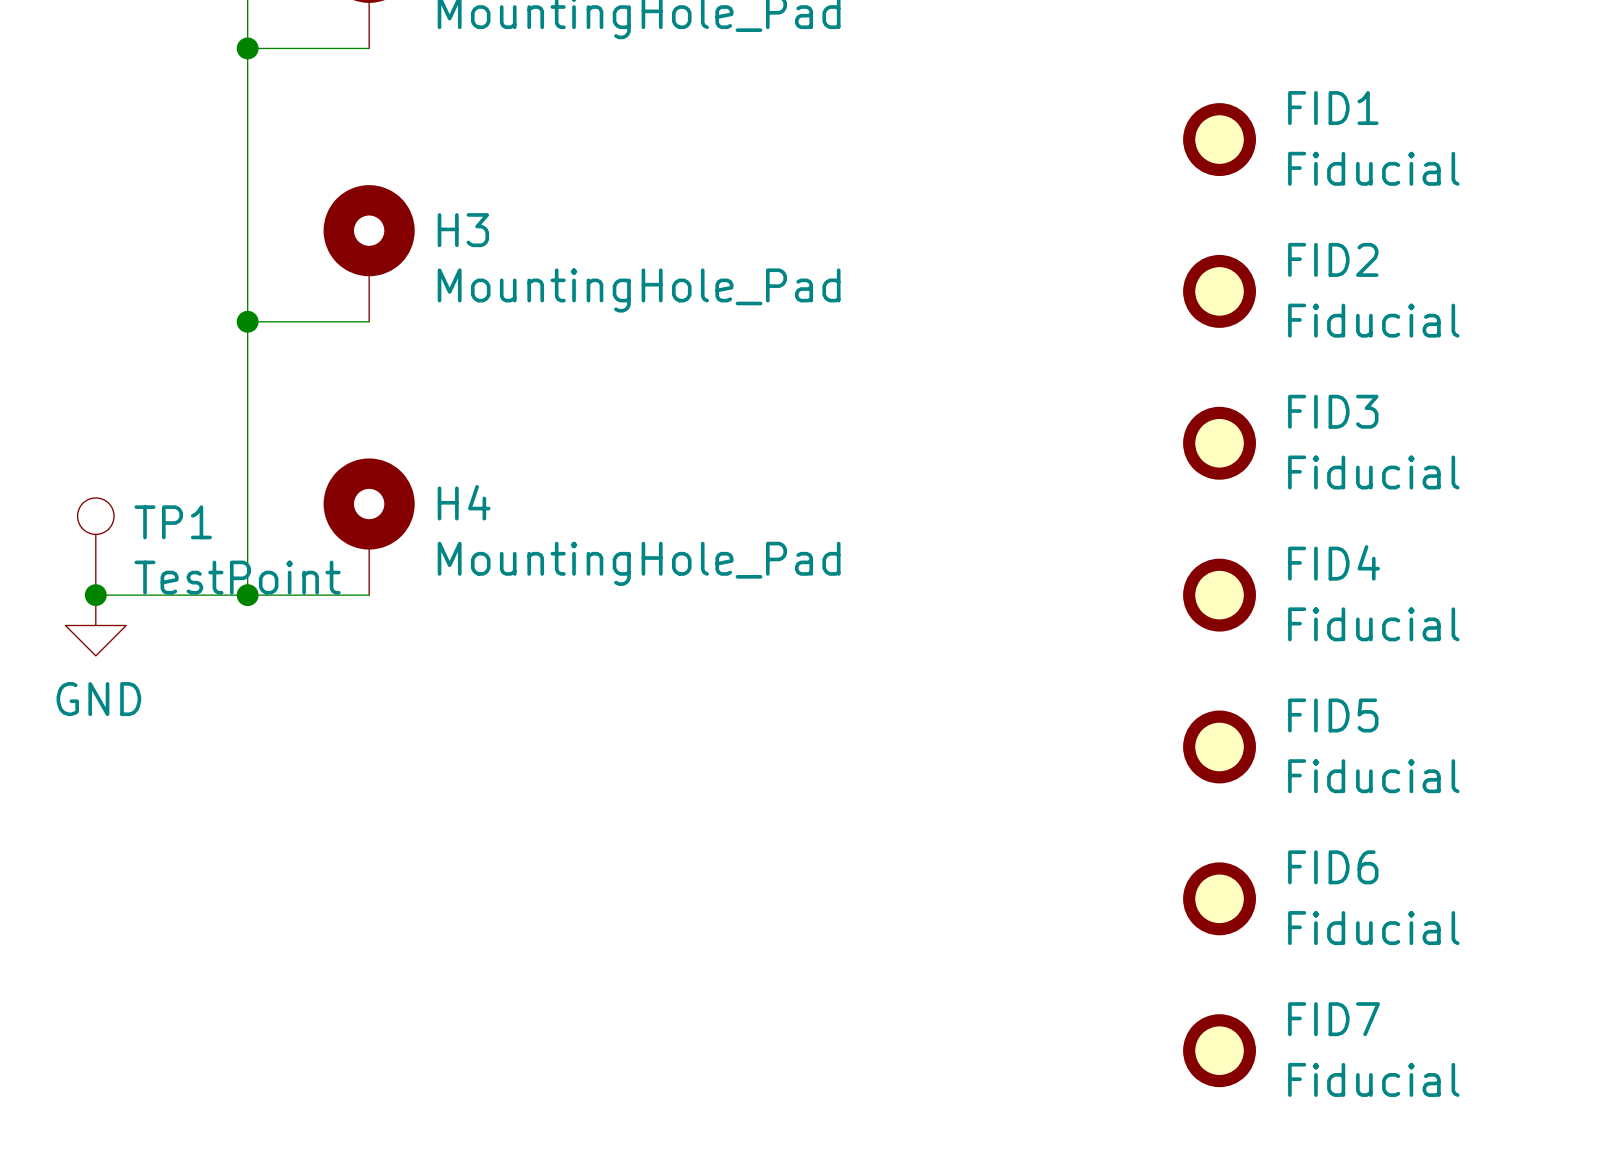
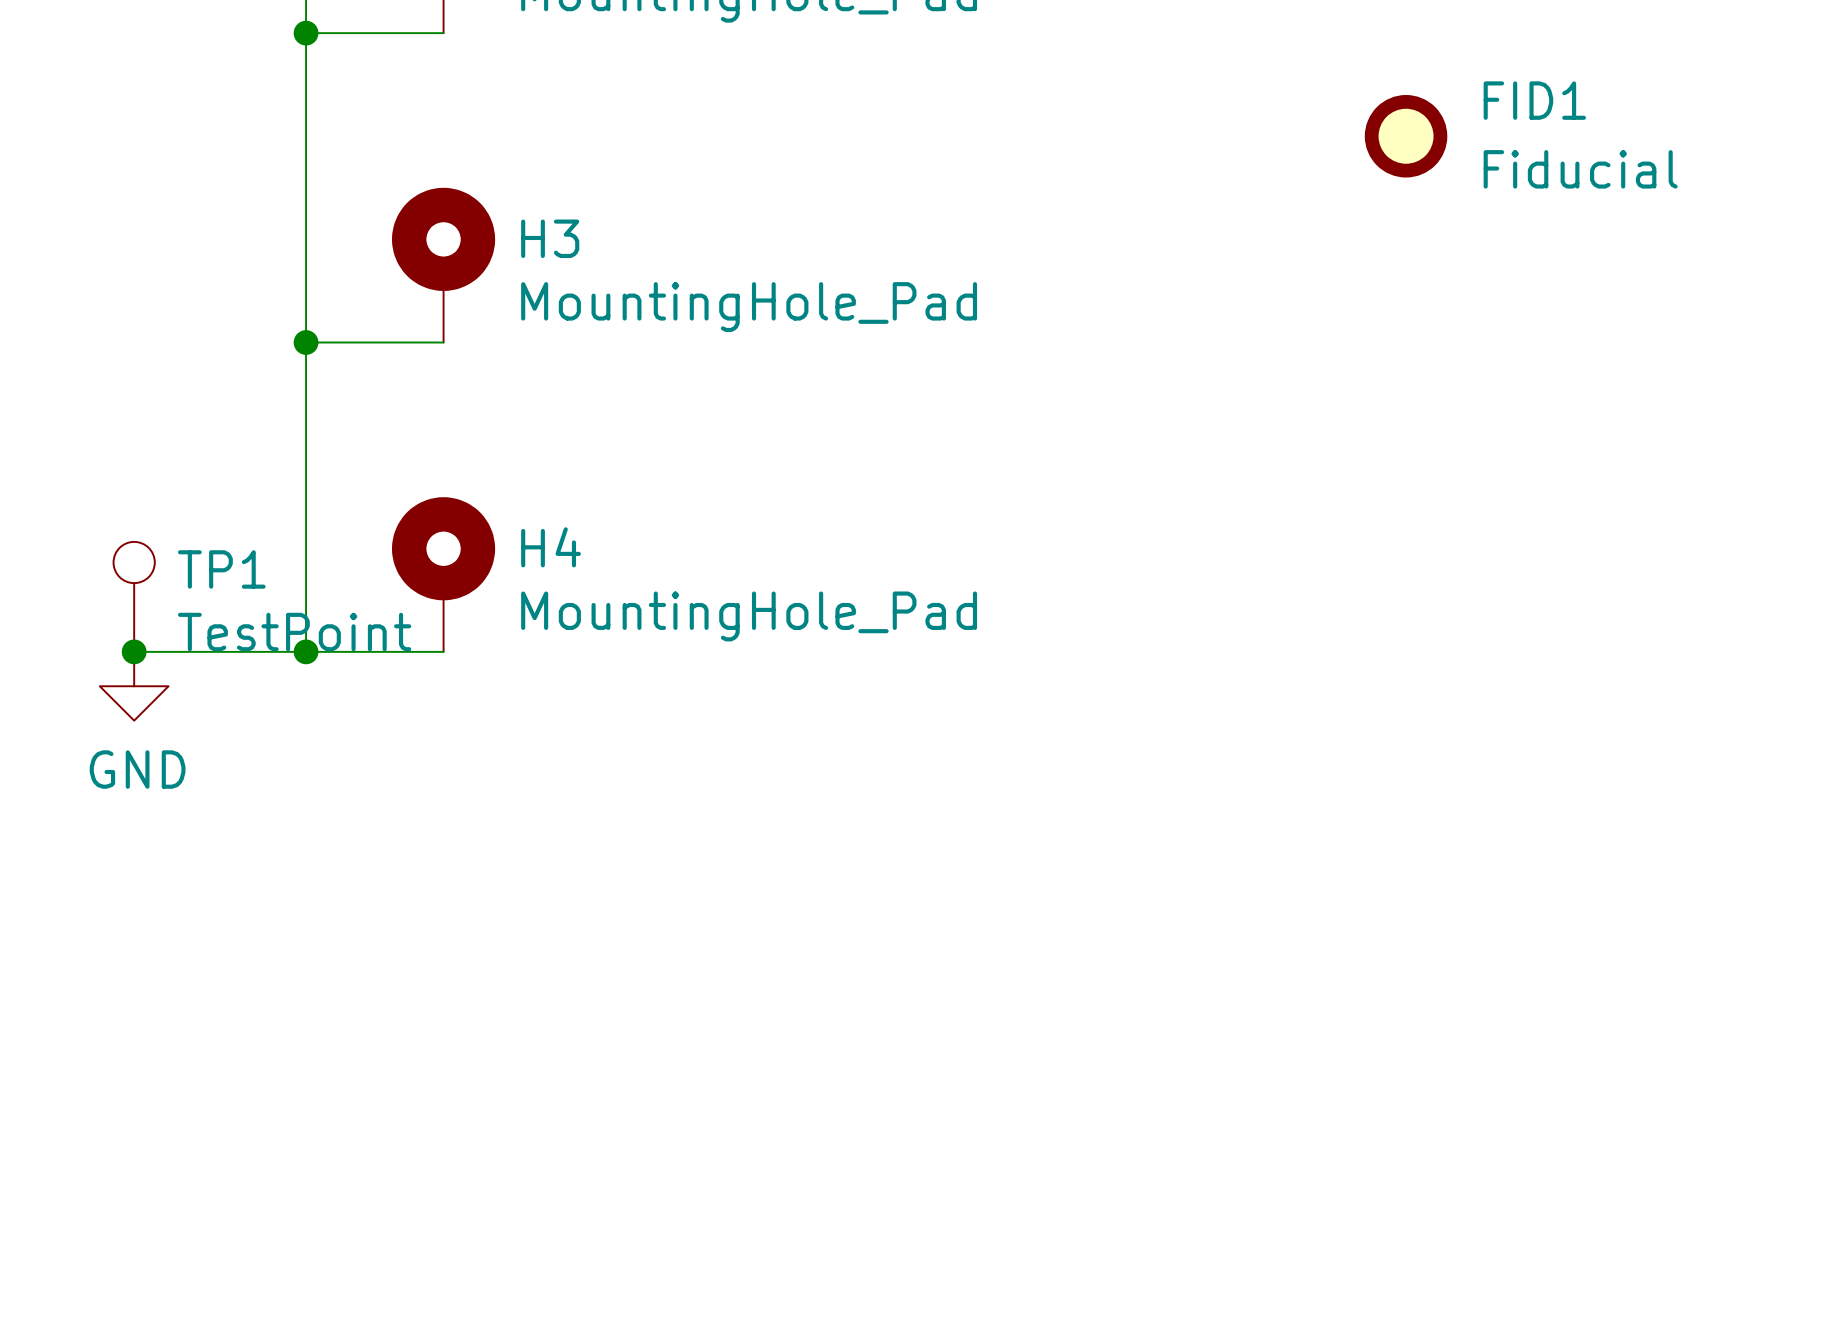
FID2: Fiducial (1219, 291) -> none
FID3: Fiducial (1219, 443) -> none
FID4: Fiducial (1219, 595) -> none
FID5: Fiducial (1219, 746) -> none
FID6: Fiducial (1219, 898) -> none
FID7: Fiducial (1219, 1050) -> none

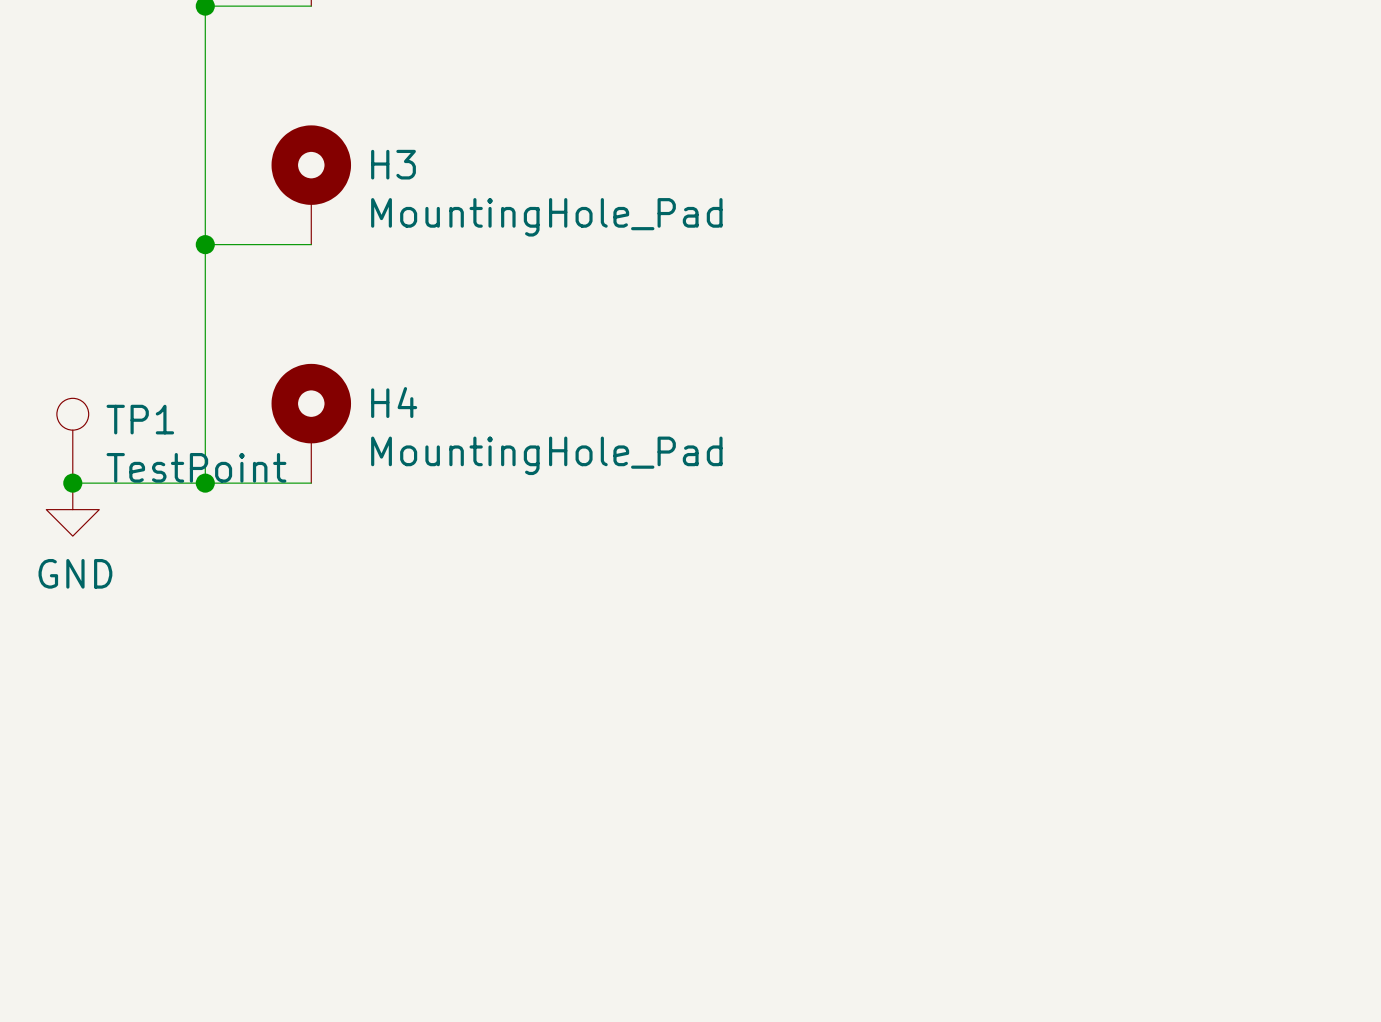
FID1: Fiducial (1406, 136) -> none

